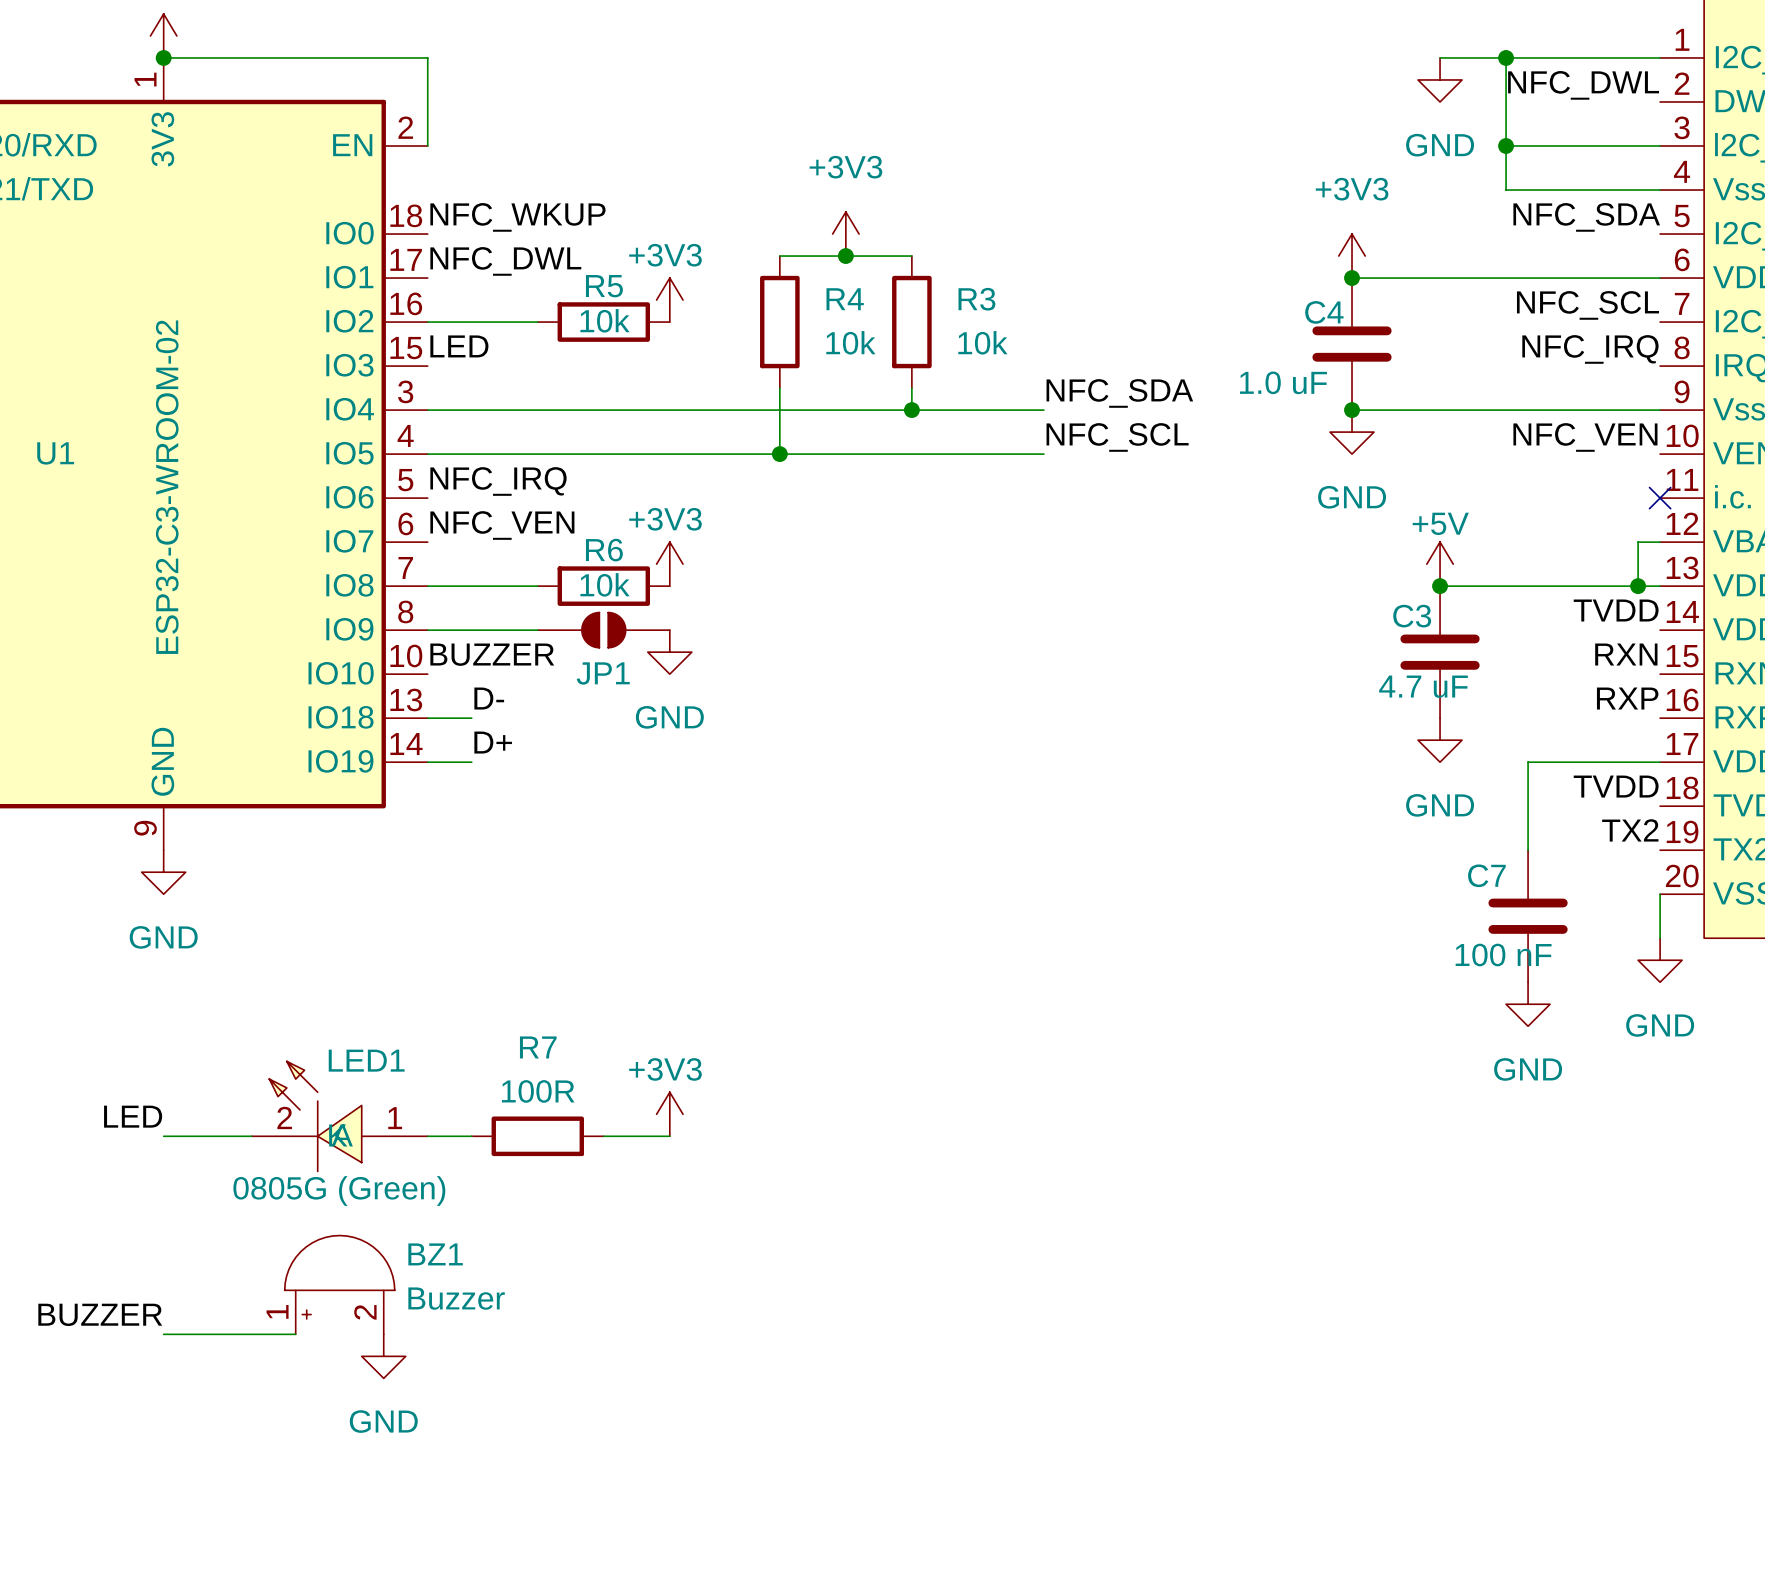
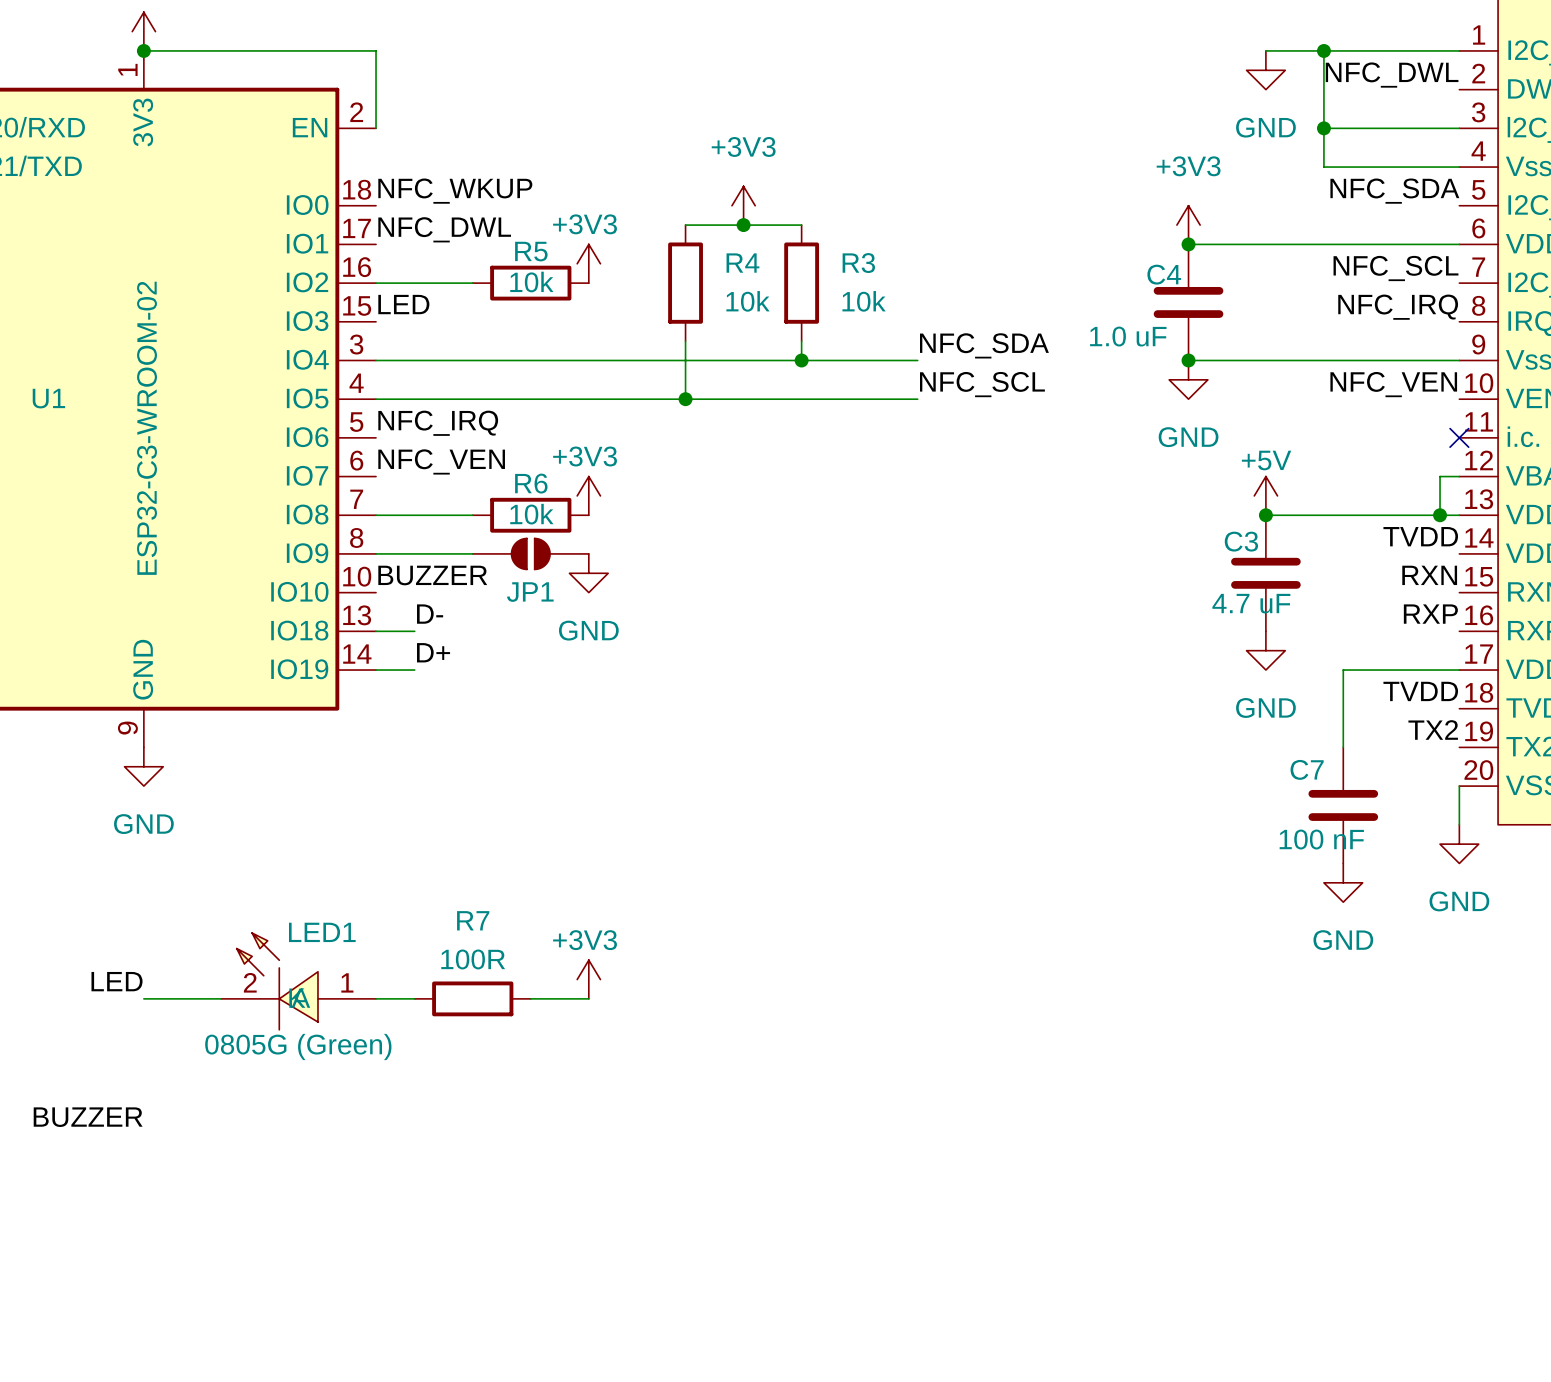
BZ1: Buzzer (339, 1284) -> none
label position: BUZZER (100, 1314) -> BUZZER (88, 1117)
wire: (163, 1334) (295, 1334) -> none
power symbol: GND (383, 1356) -> none

